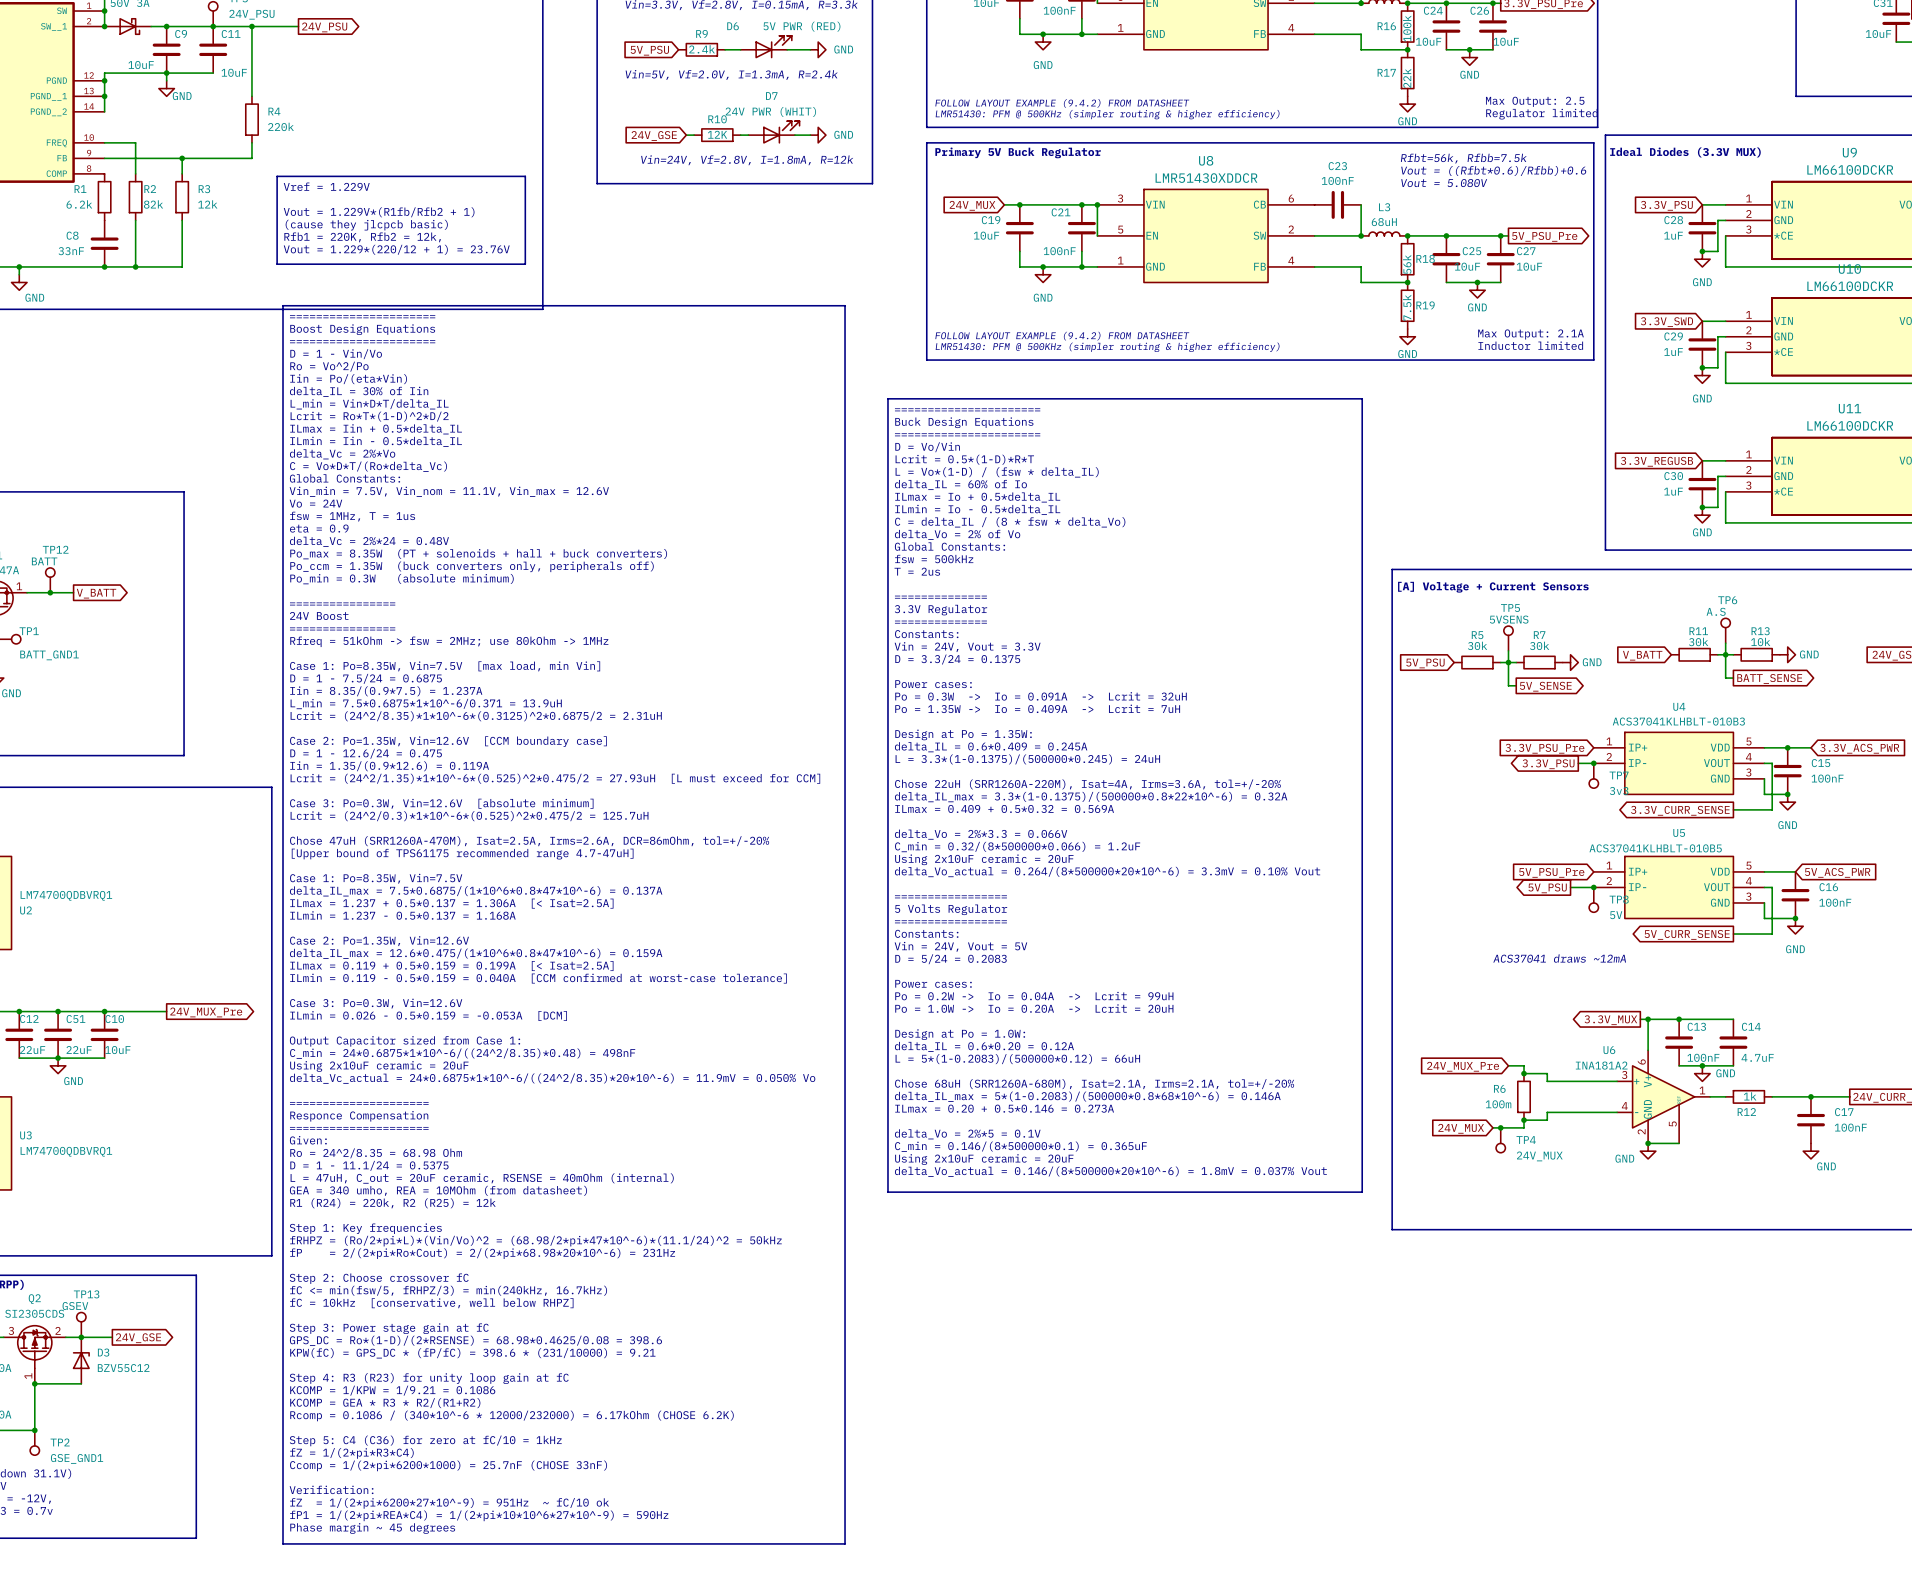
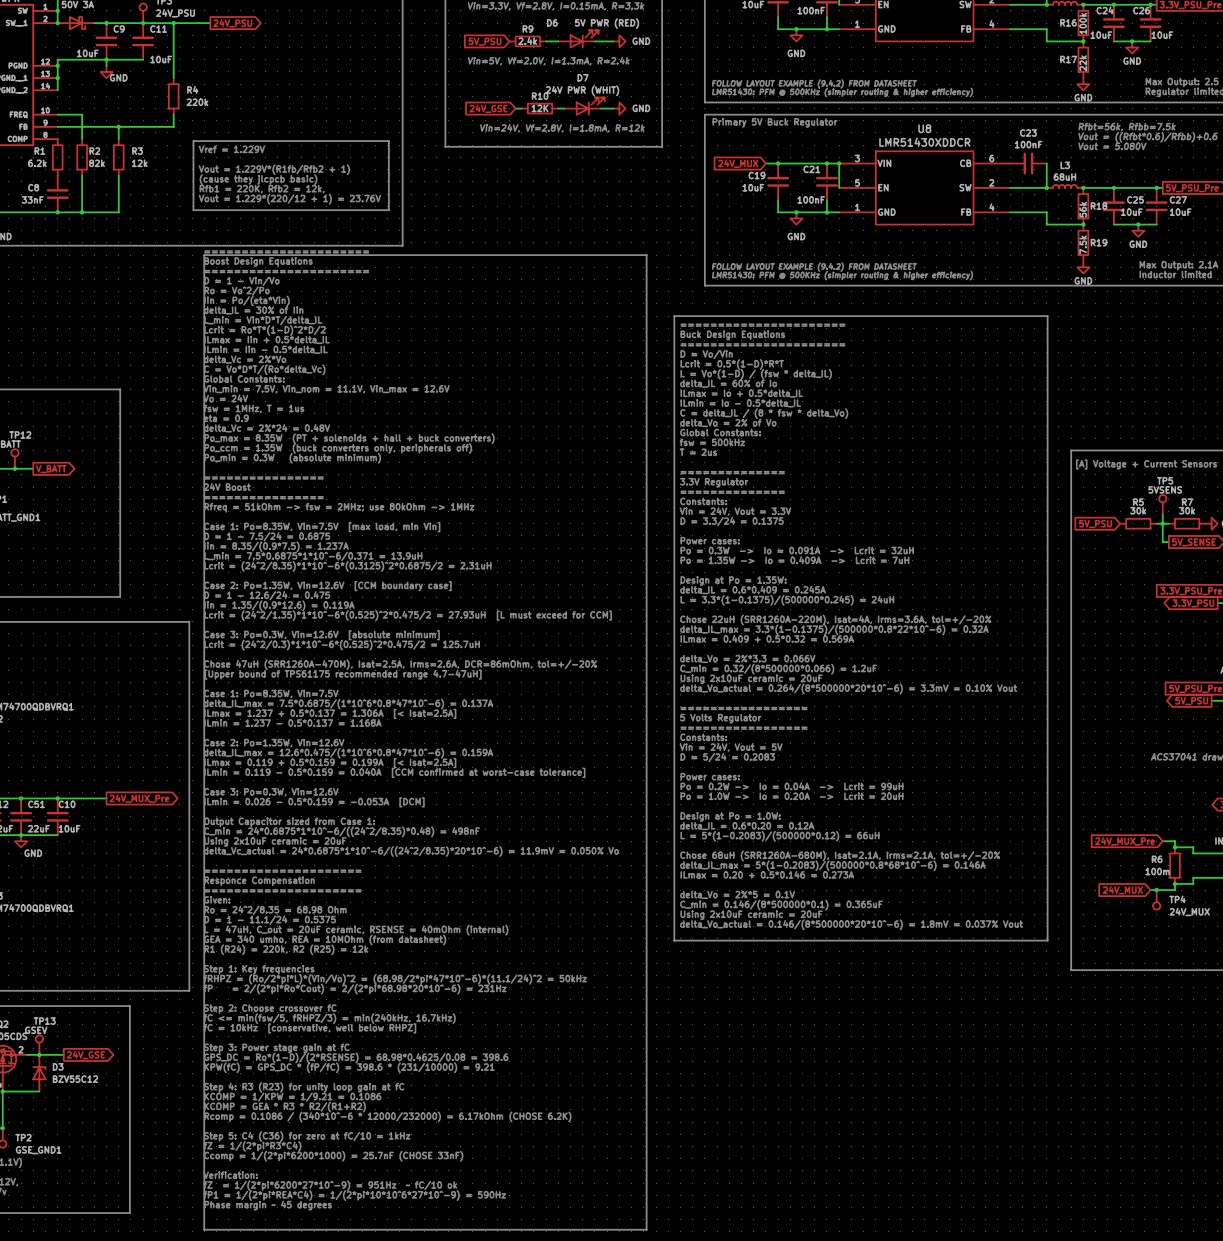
line: (283, 305) (845, 305) (845, 1543) (283, 1543) (283, 305) -> (204, 255) (646, 255) (646, 1229) (204, 1229) (204, 255)

